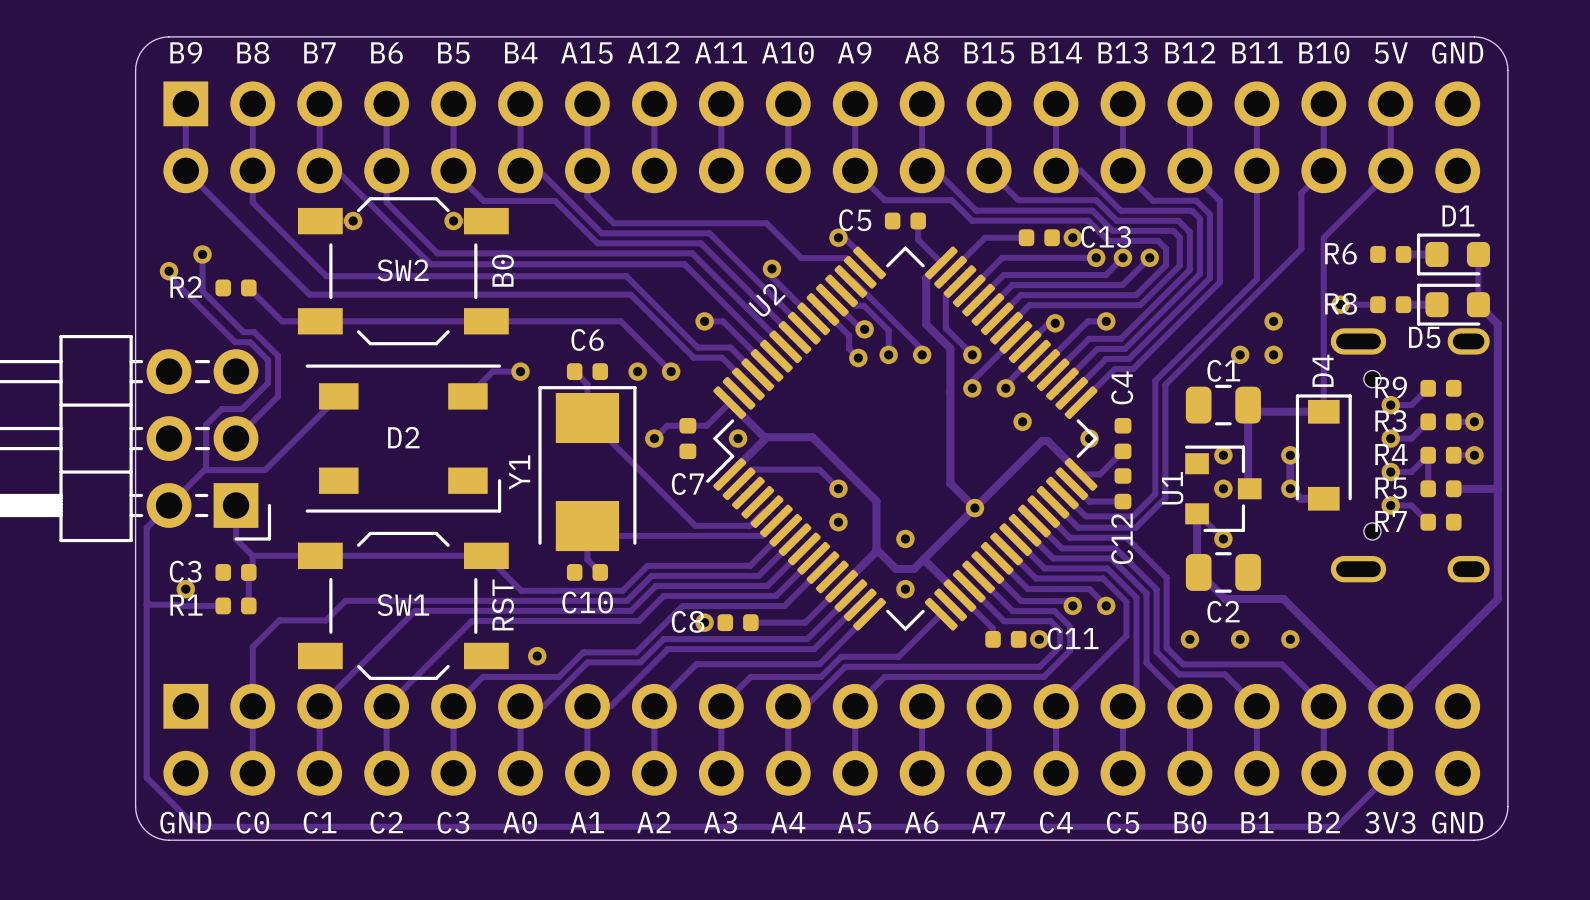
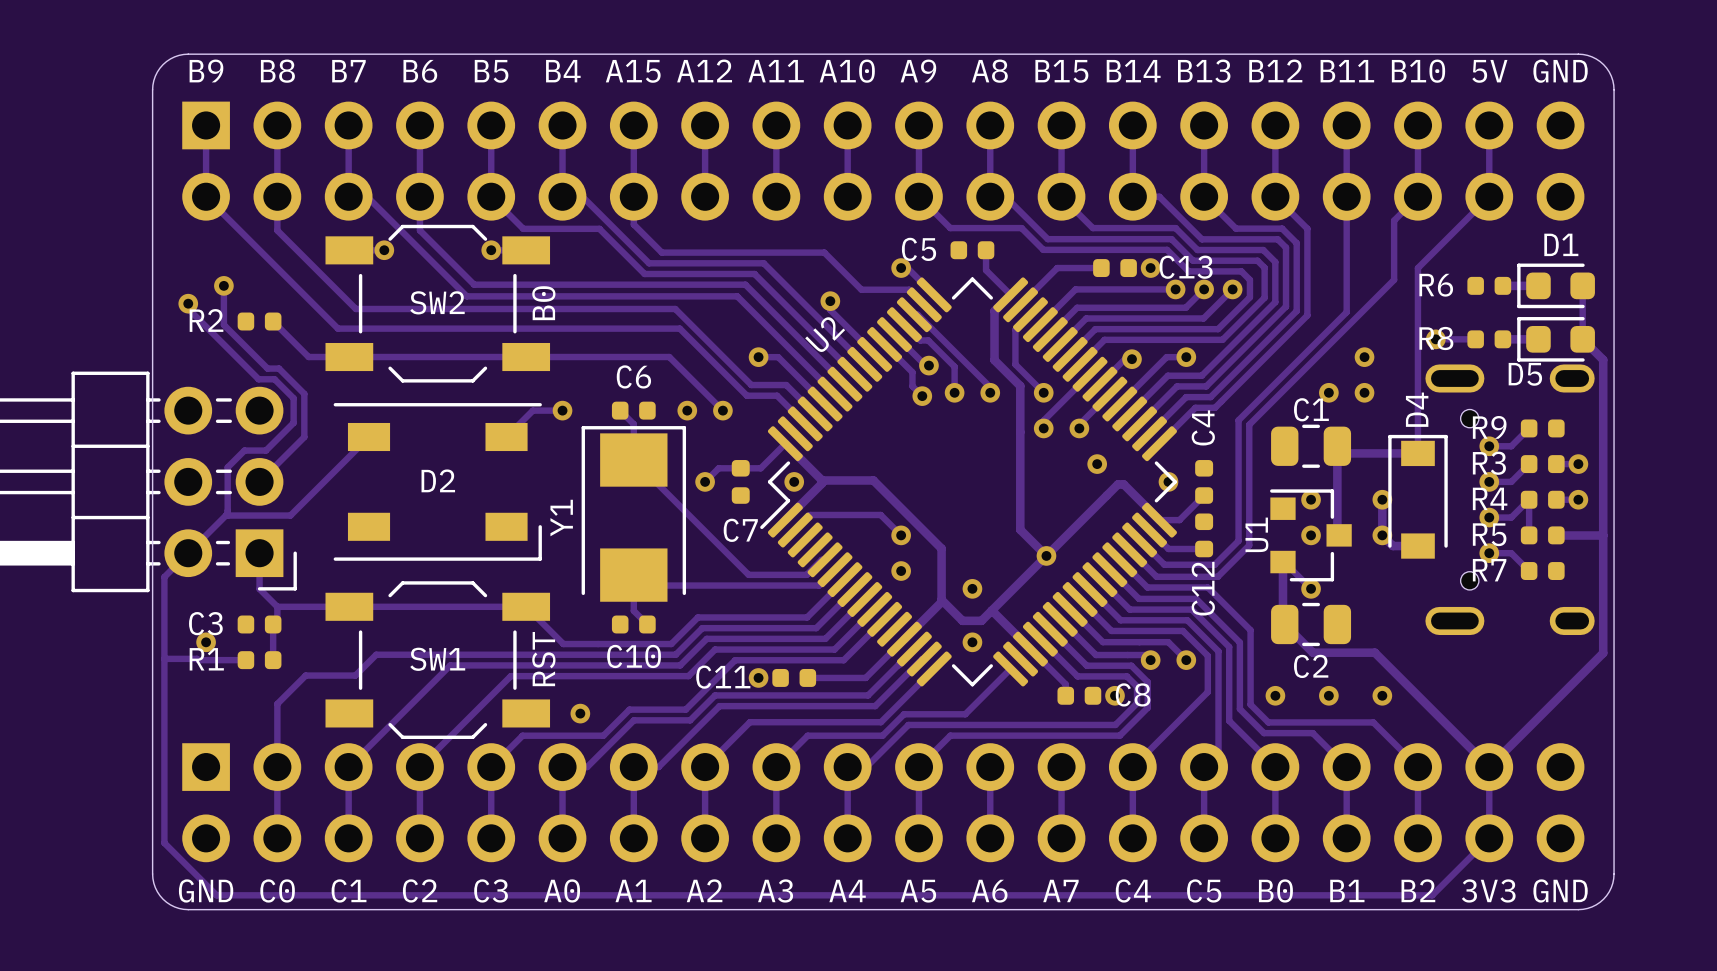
C8 name: C8 (688, 621) -> C11 (723, 677)
C11 name: C11 (1073, 638) -> C8 (1133, 694)

